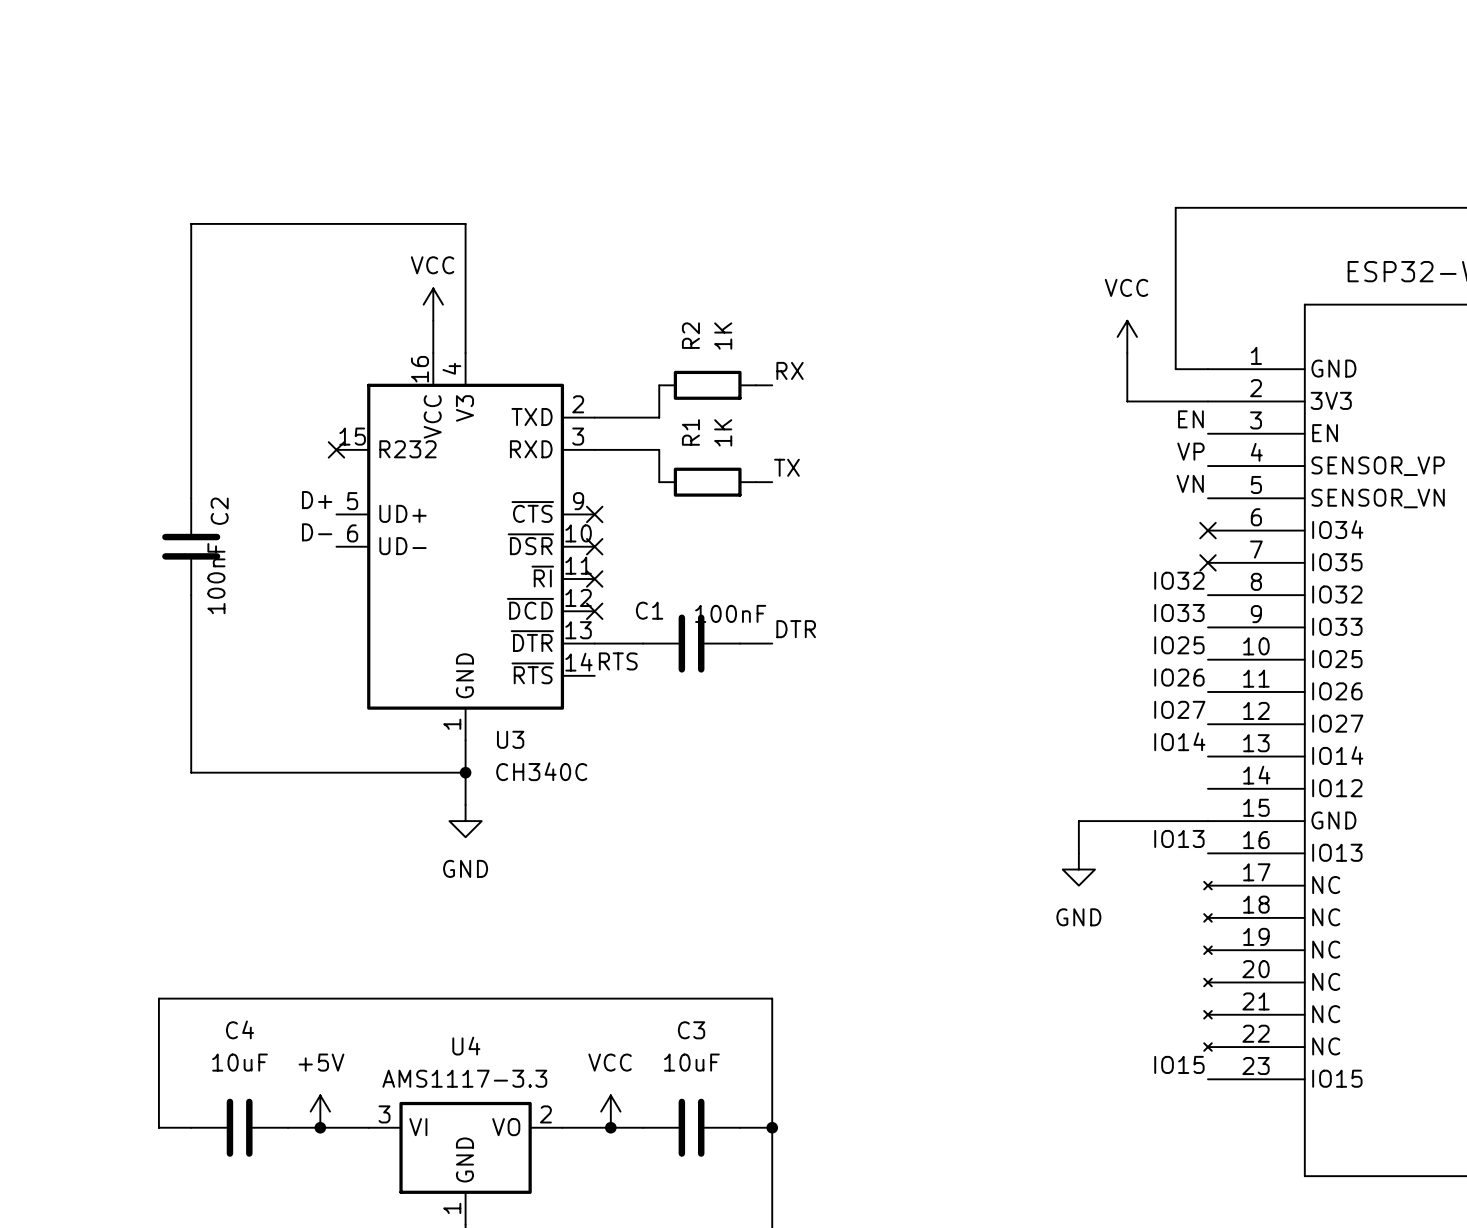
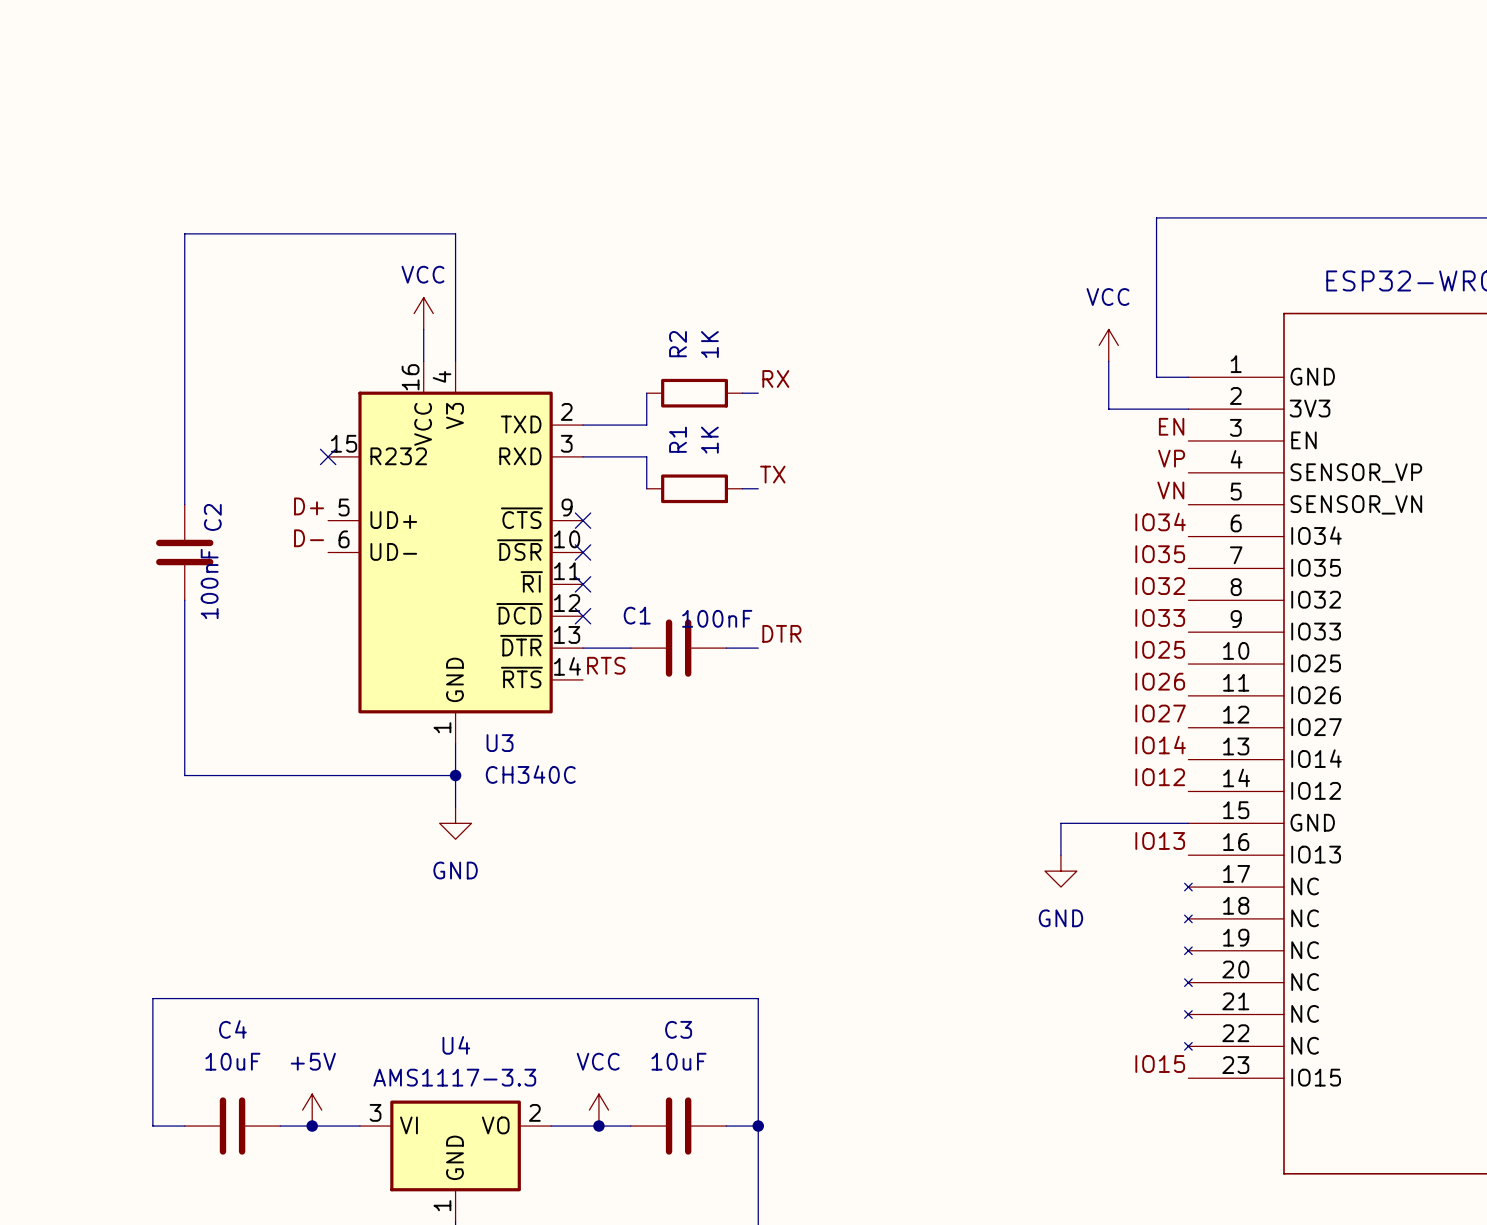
label: none -> IO34 (1160, 521)
no-connect mark: (1207, 530) -> none
label: none -> IO35 (1160, 554)
no-connect mark: (1207, 562) -> none
label: none -> IO12 (1160, 777)

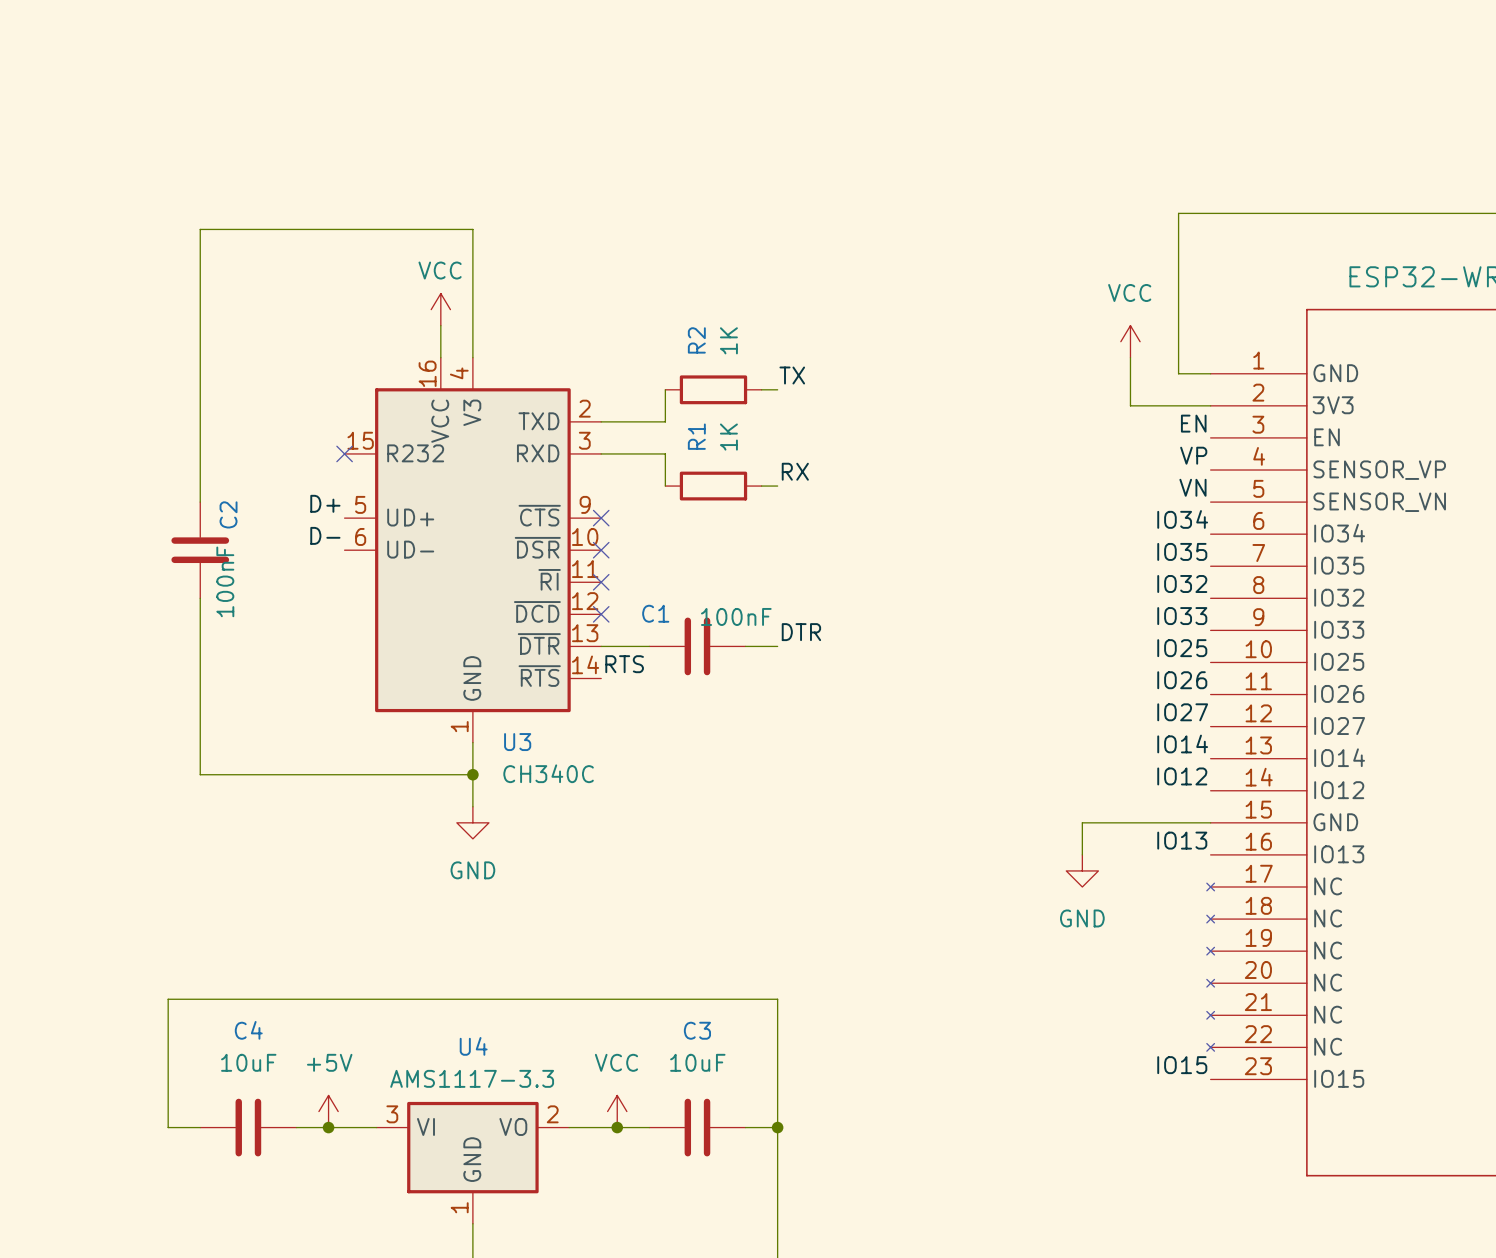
label: RX (775, 378) -> TX (792, 375)
label: TX (772, 474) -> RX (795, 471)

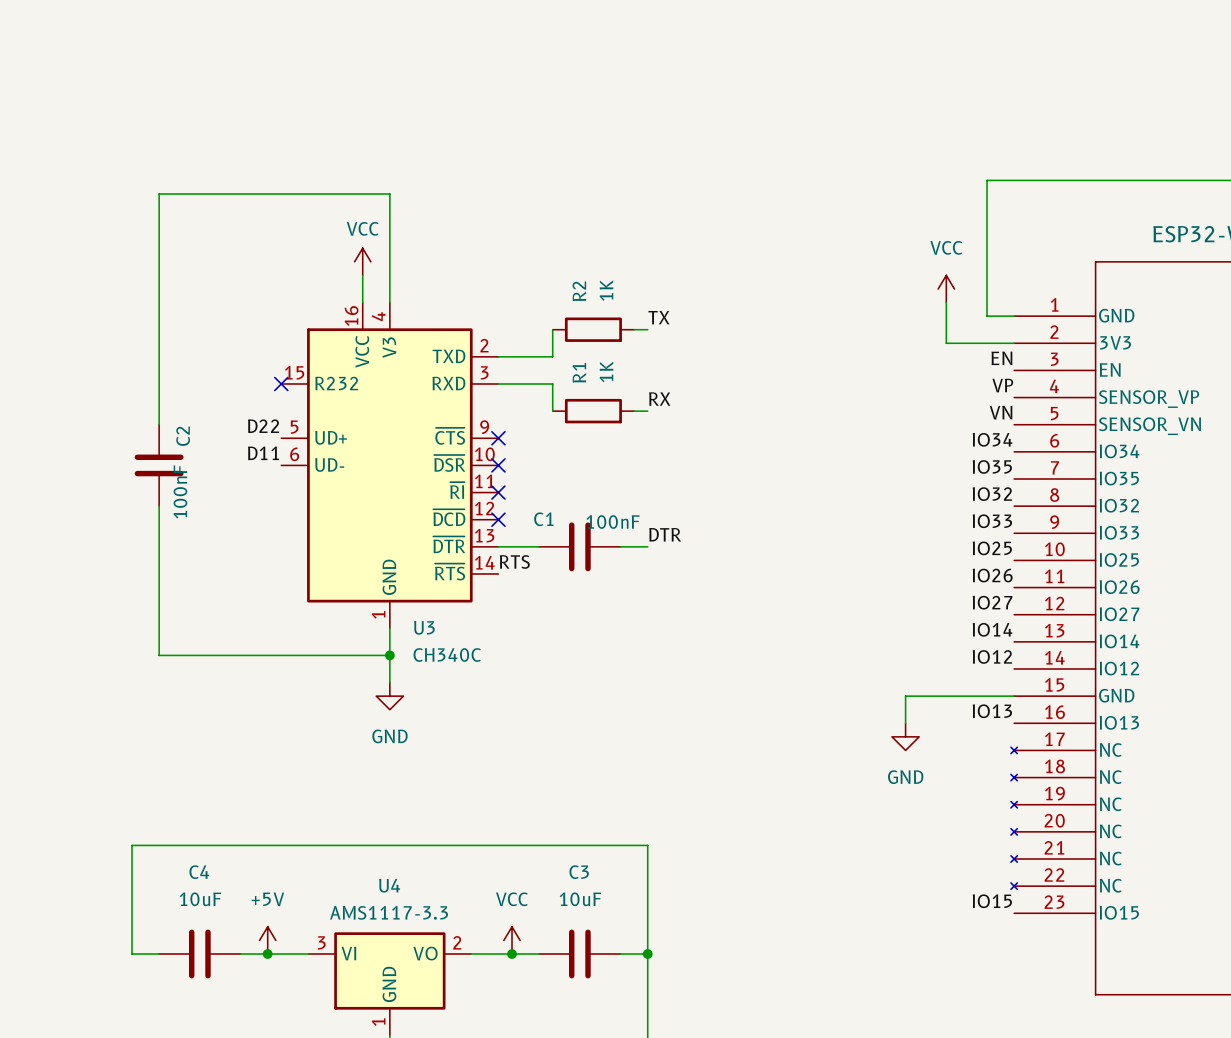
label: D+ (325, 503) -> D22 (263, 426)
label: D- (325, 535) -> D11 (263, 453)

